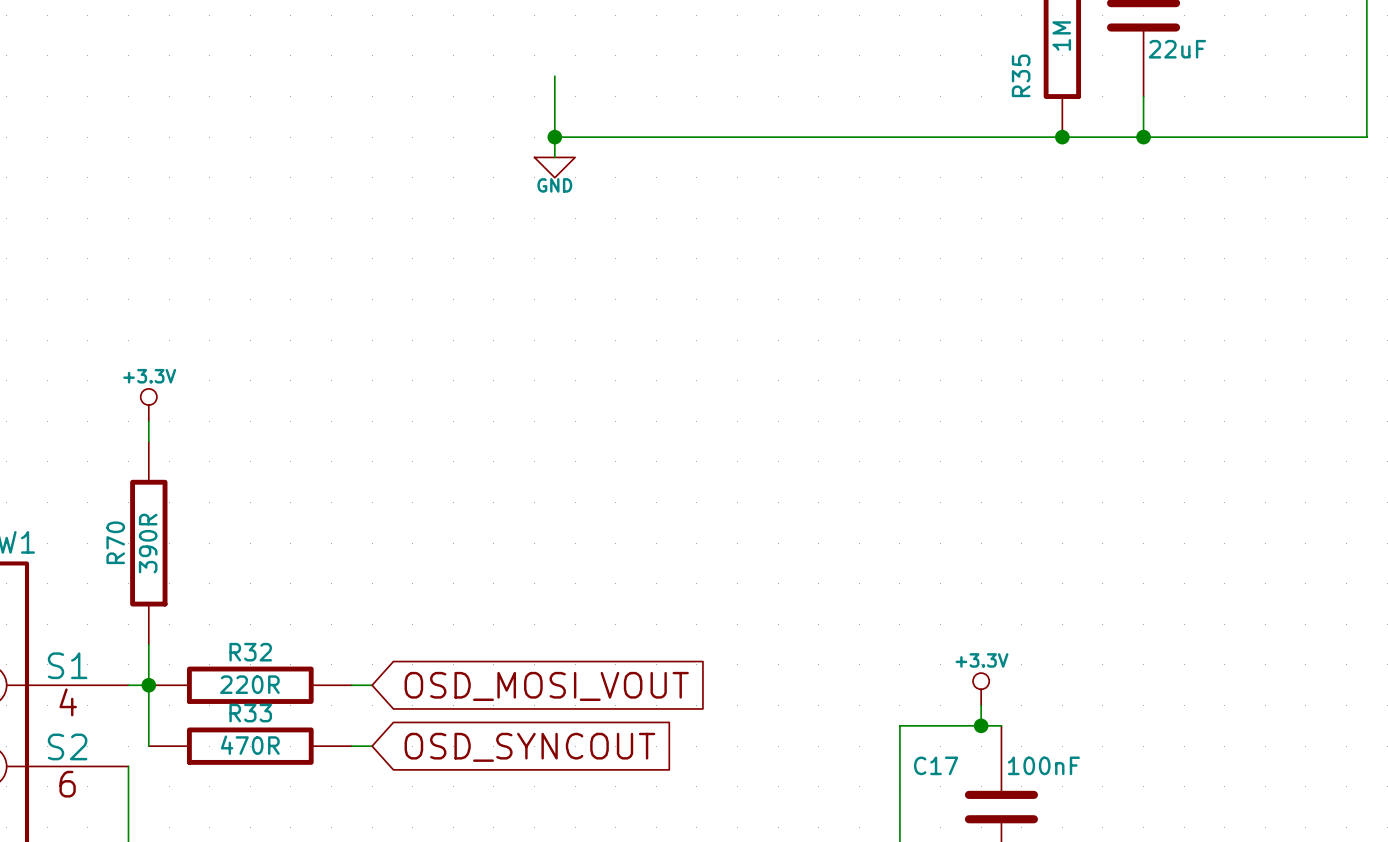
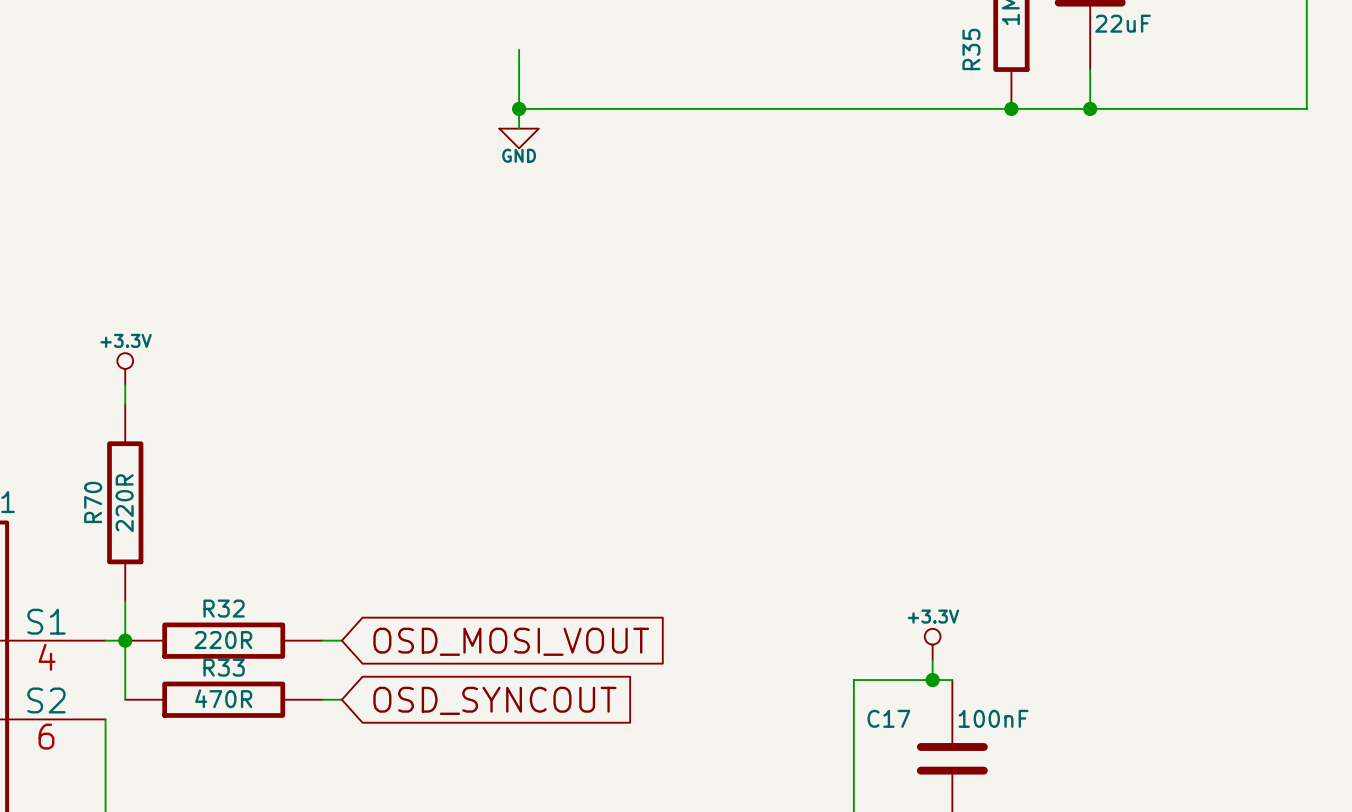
R70 value: 390R (148, 543) -> 220R (124, 503)

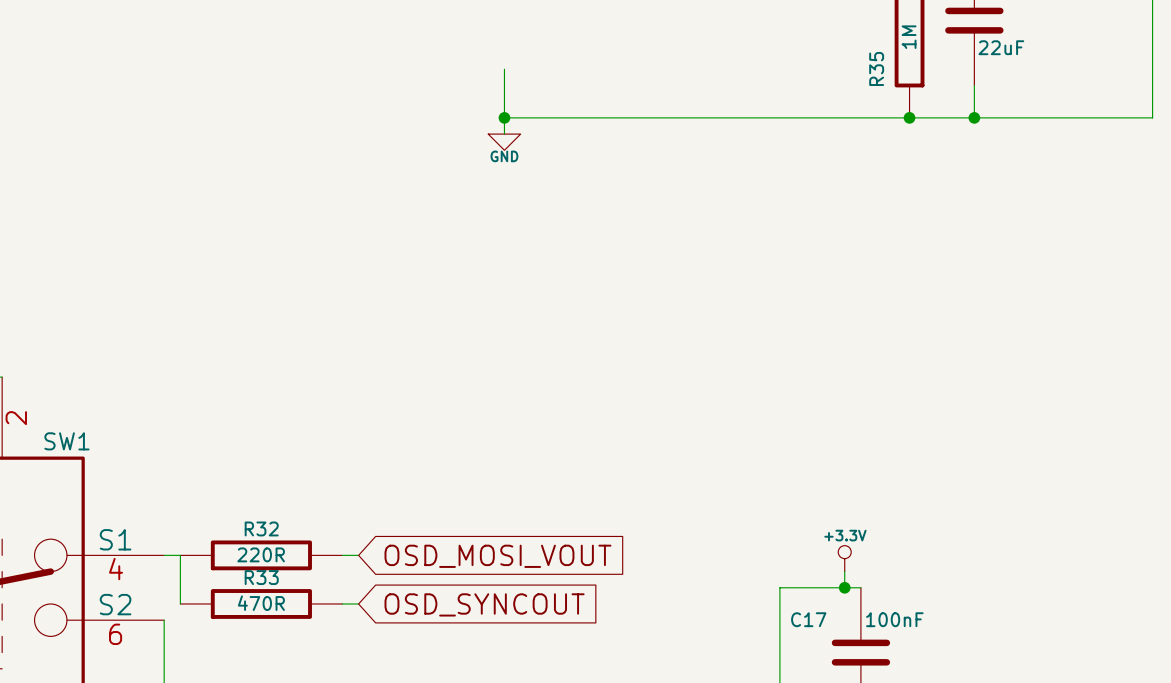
power symbol: +3.3V (125, 368) -> none
wire: (125, 384) (125, 404) -> none
R70: 220R (125, 502) -> none
wire: (125, 601) (125, 640) -> none
junction: (125, 640) -> none

